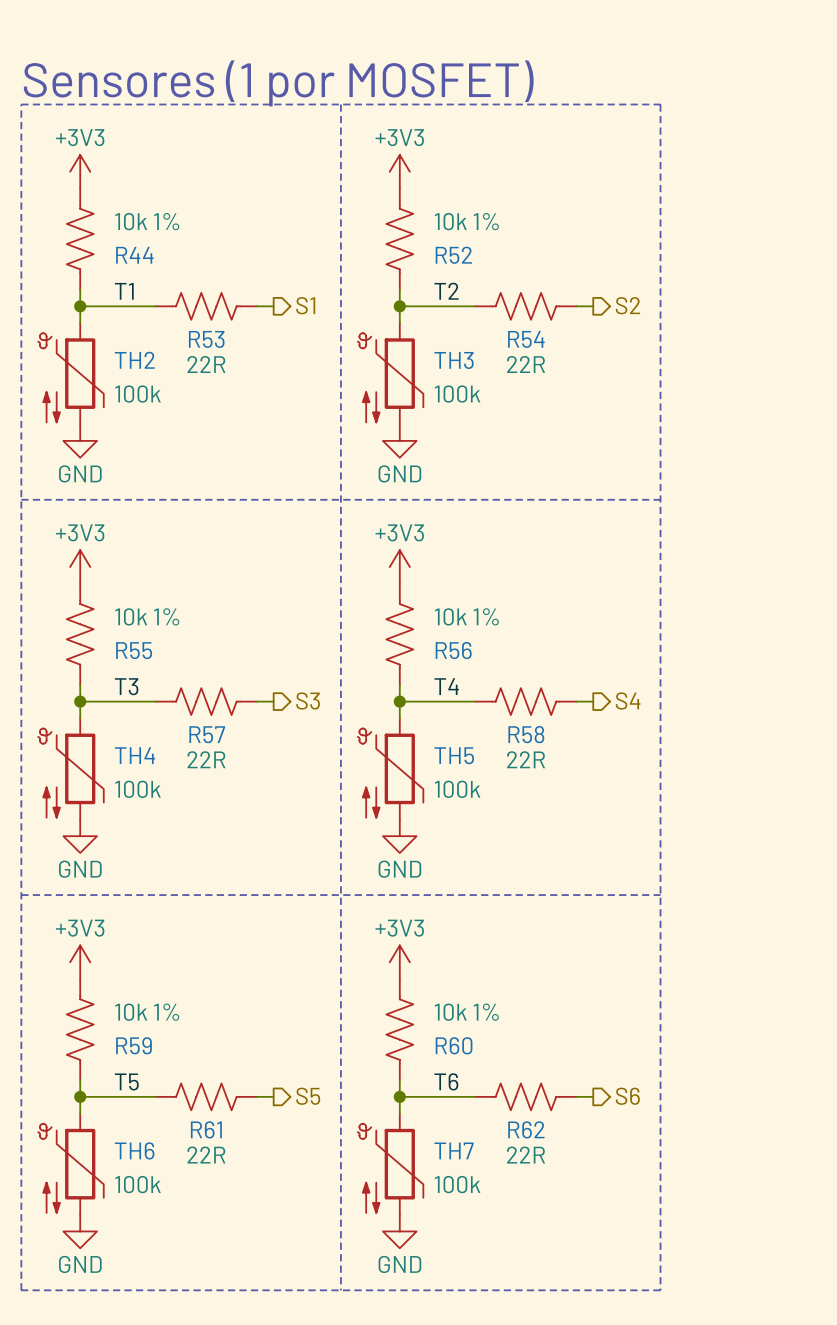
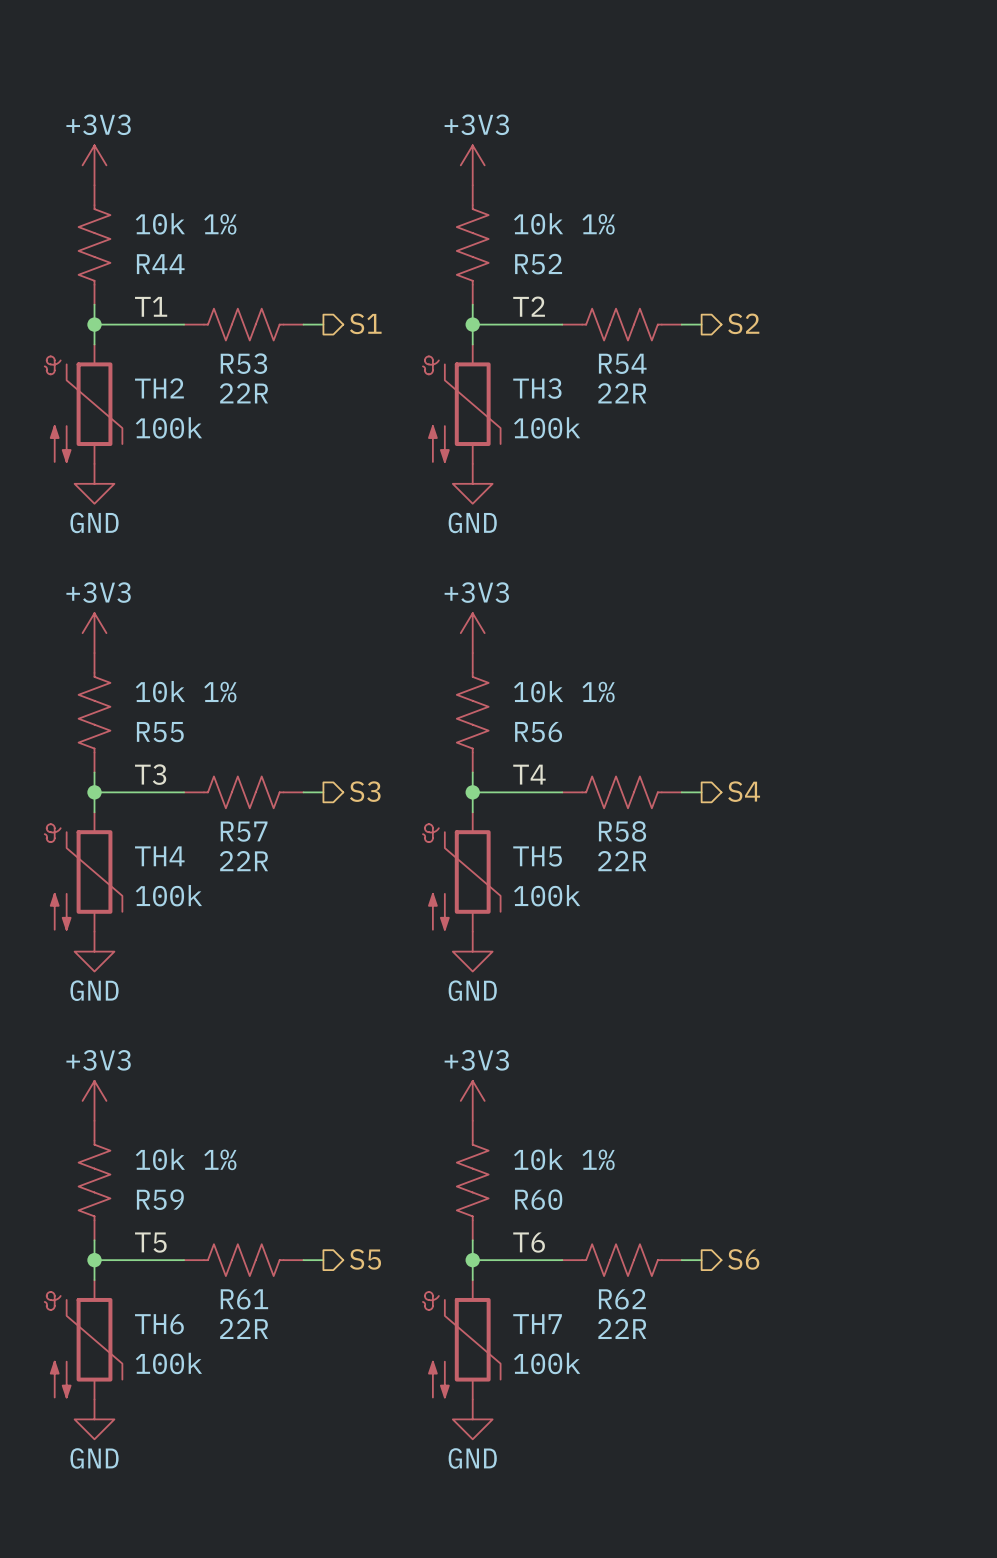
text: Sensores (1 por MOSFET) (278, 83) -> none
line: (21, 104) (660, 104) (660, 1290) (21, 1290) (21, 104) -> none
line: (340, 104) (340, 1290) -> none
line: (21, 499) (660, 499) -> none
line: (21, 895) (660, 895) -> none

